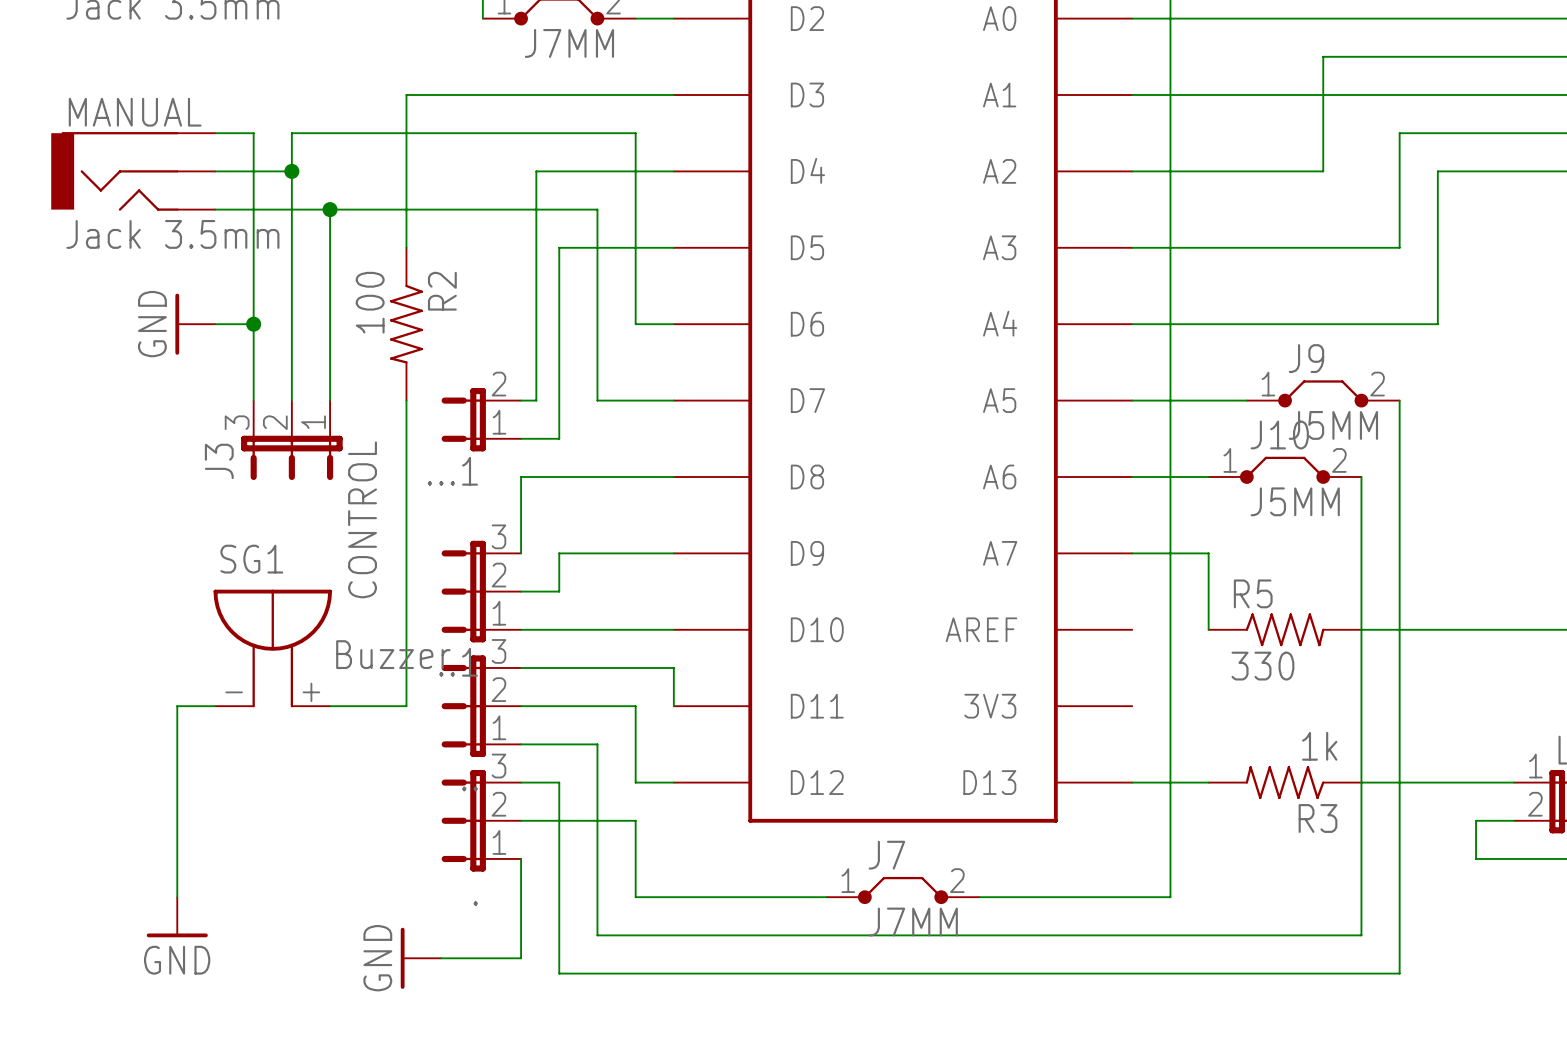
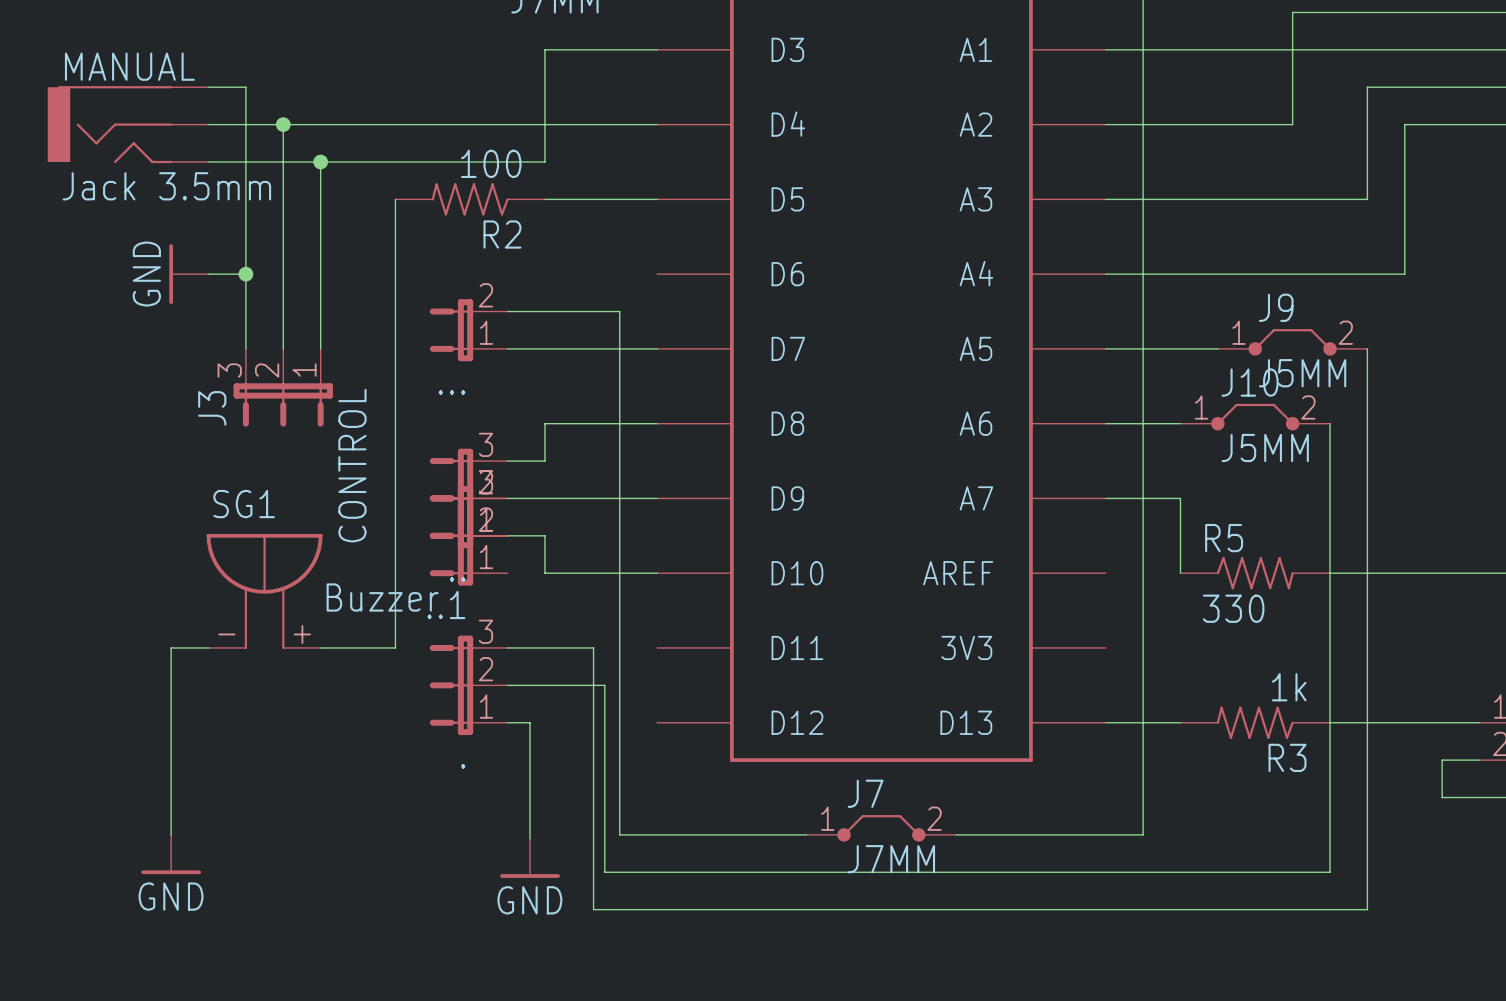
wire: (559, 95) (406, 95) (406, 247) -> (544, 49) (544, 161)
wire: (291, 171) (291, 133) (635, 133) (635, 324) (673, 324) -> (283, 124) (522, 124)
wire: (536, 171) (536, 400) -> none
wire: (559, 209) (597, 209) (597, 400) -> (522, 348) (582, 348)
wire: (559, 247) (559, 438) (521, 438) -> none
R2 rotation: 0° (406, 324) -> 90° clockwise (470, 199)
R2 position: (406, 324) -> (470, 199)
wire: none -> (507, 311) (619, 311) (619, 647)
part: none -> (468, 330)
...1: (481, 419) -> none
wire: (559, 476) (521, 476) (521, 553) -> (544, 423) (544, 461) (507, 461)
wire: (559, 553) (559, 591) -> (544, 498) (507, 498)
wire: (521, 629) (559, 629) -> (544, 535) (544, 573)
wire: (521, 667) (673, 667) (673, 706) -> none
part position: (481, 706) -> (468, 498)
wire: (608, 706) (635, 706) -> (593, 647) (593, 909)
wire: (597, 744) (597, 935) (620, 935) -> (582, 685) (604, 685) (604, 872)
wire: (543, 782) (559, 782) (559, 973) (608, 973) -> (530, 722) (530, 838)
wire: (635, 782) (673, 782) -> (619, 722) (619, 760)
part position: (481, 820) -> (468, 685)
wire: (521, 820) (635, 820) -> none
wire: (521, 858) (521, 958) (440, 958) -> none
power symbol rotation: 0° (402, 958) -> 90° counterclockwise (530, 876)
power symbol position: GND (420, 958) -> GND (530, 858)

